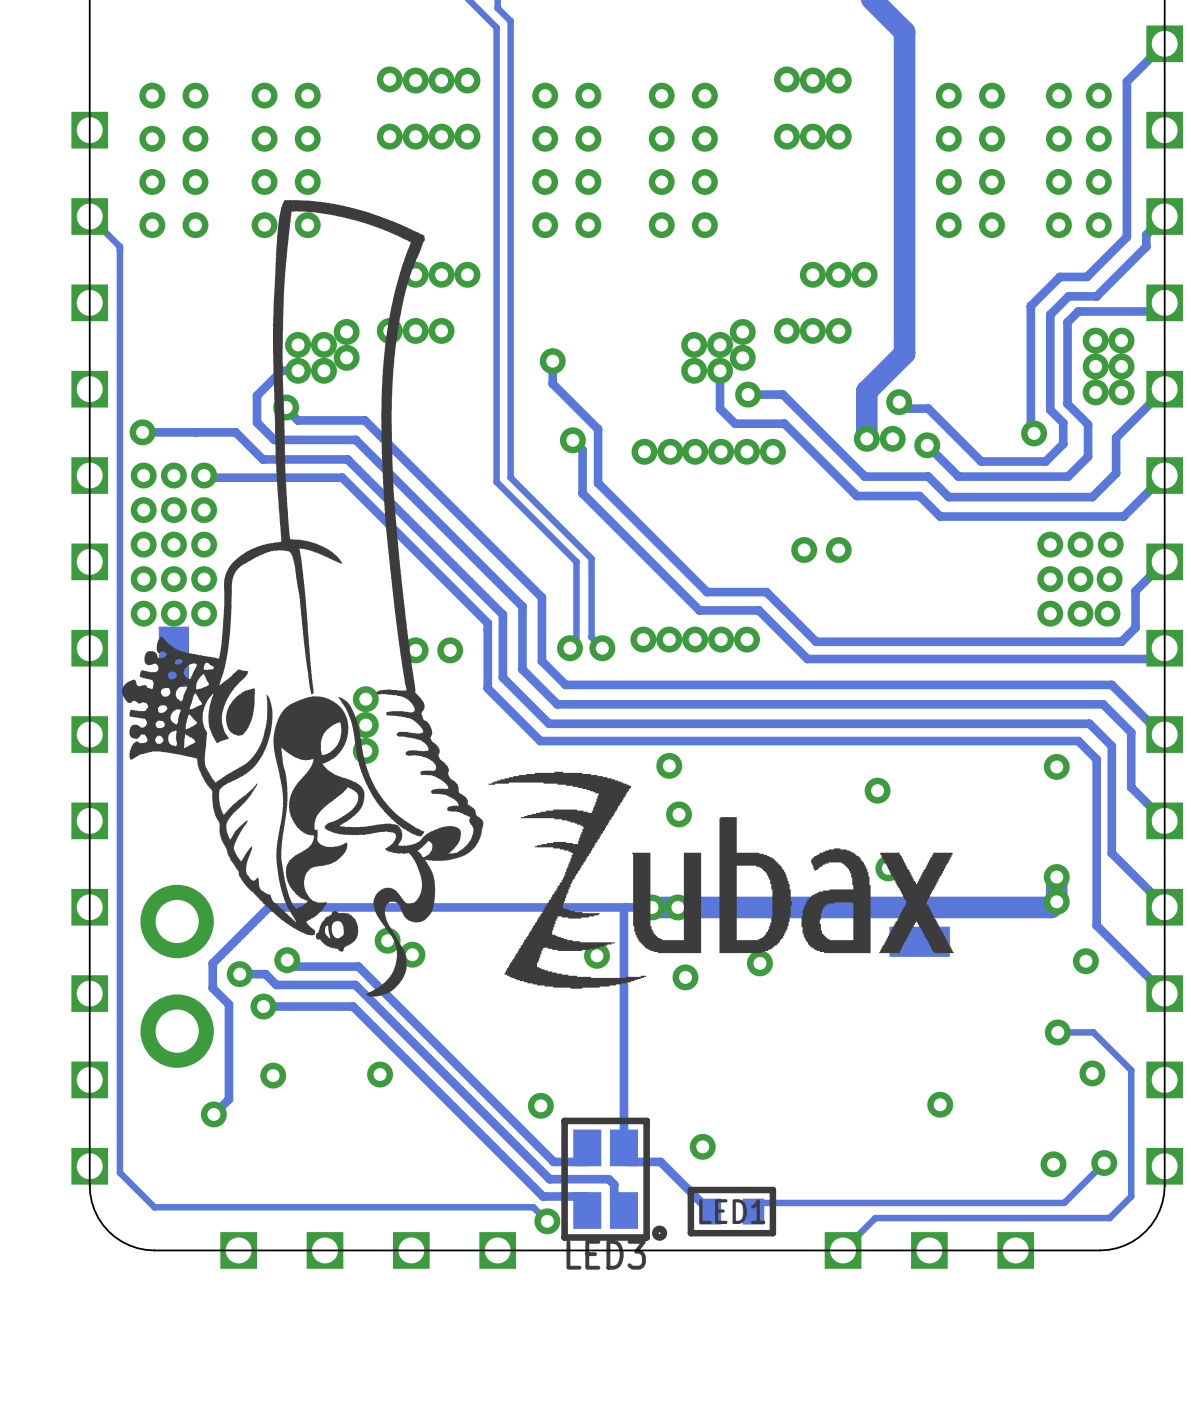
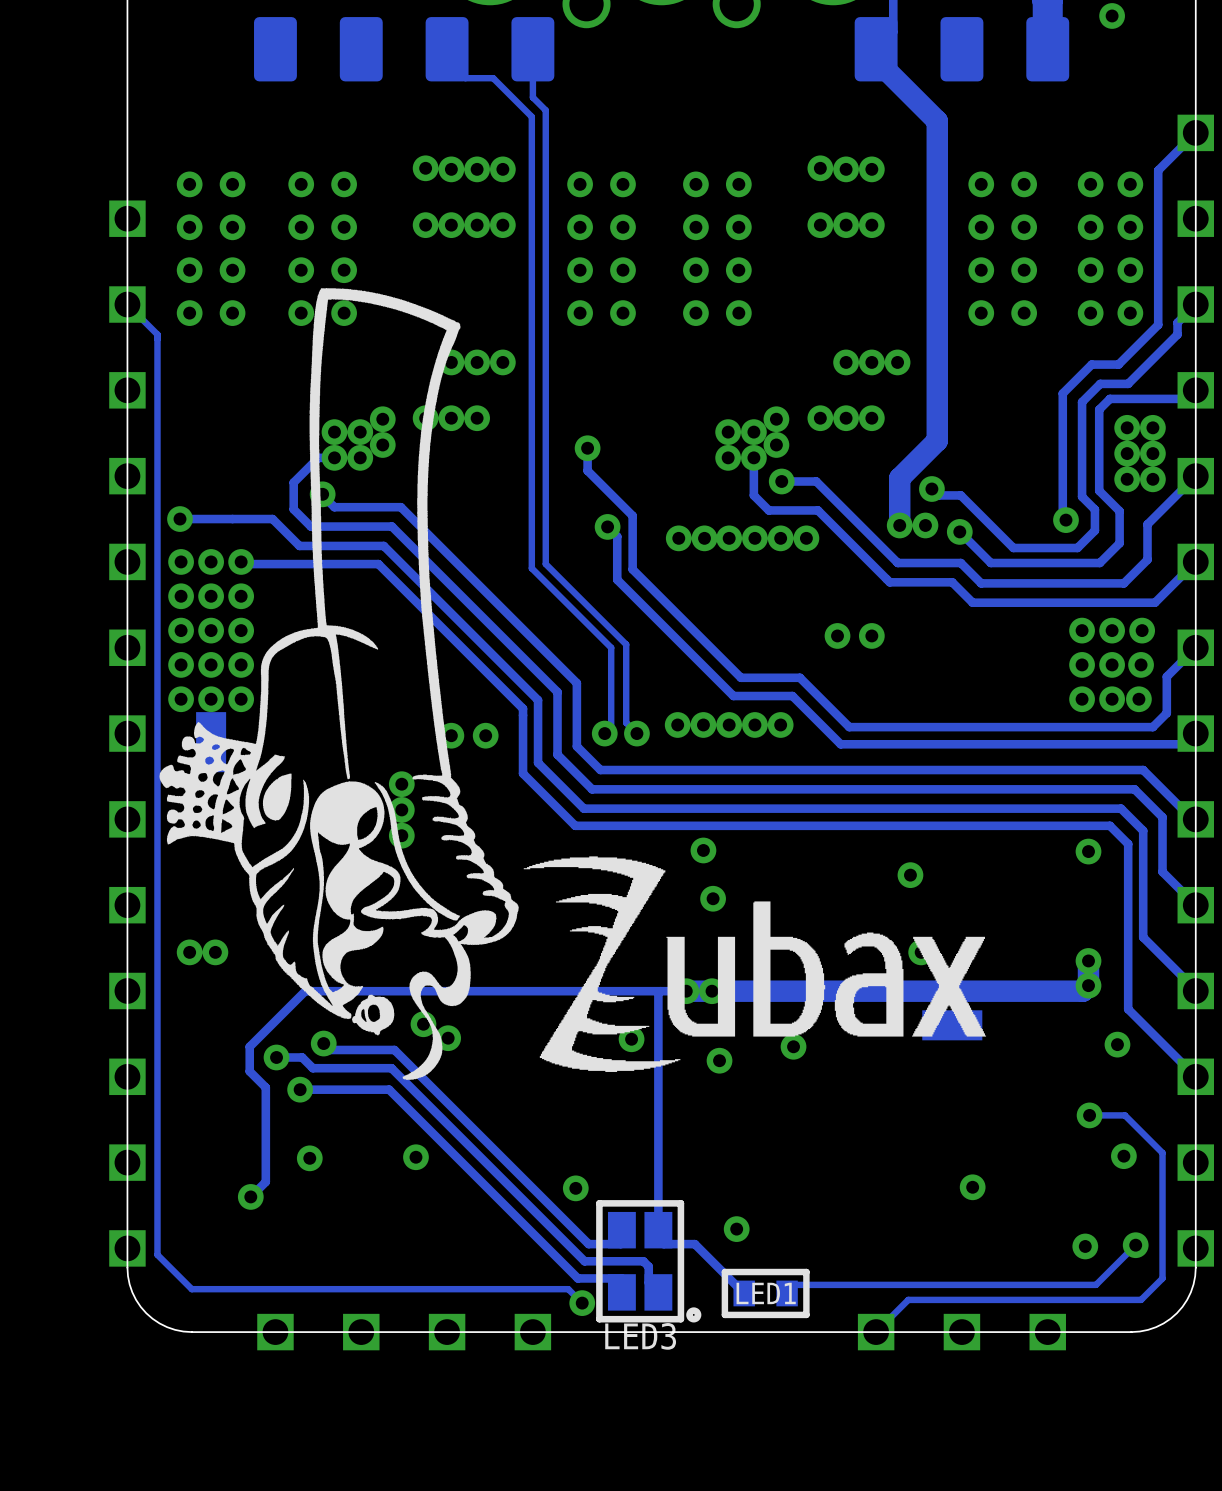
via: none -> (189, 952)
via: none -> (215, 952)
part: (177, 976) -> none

